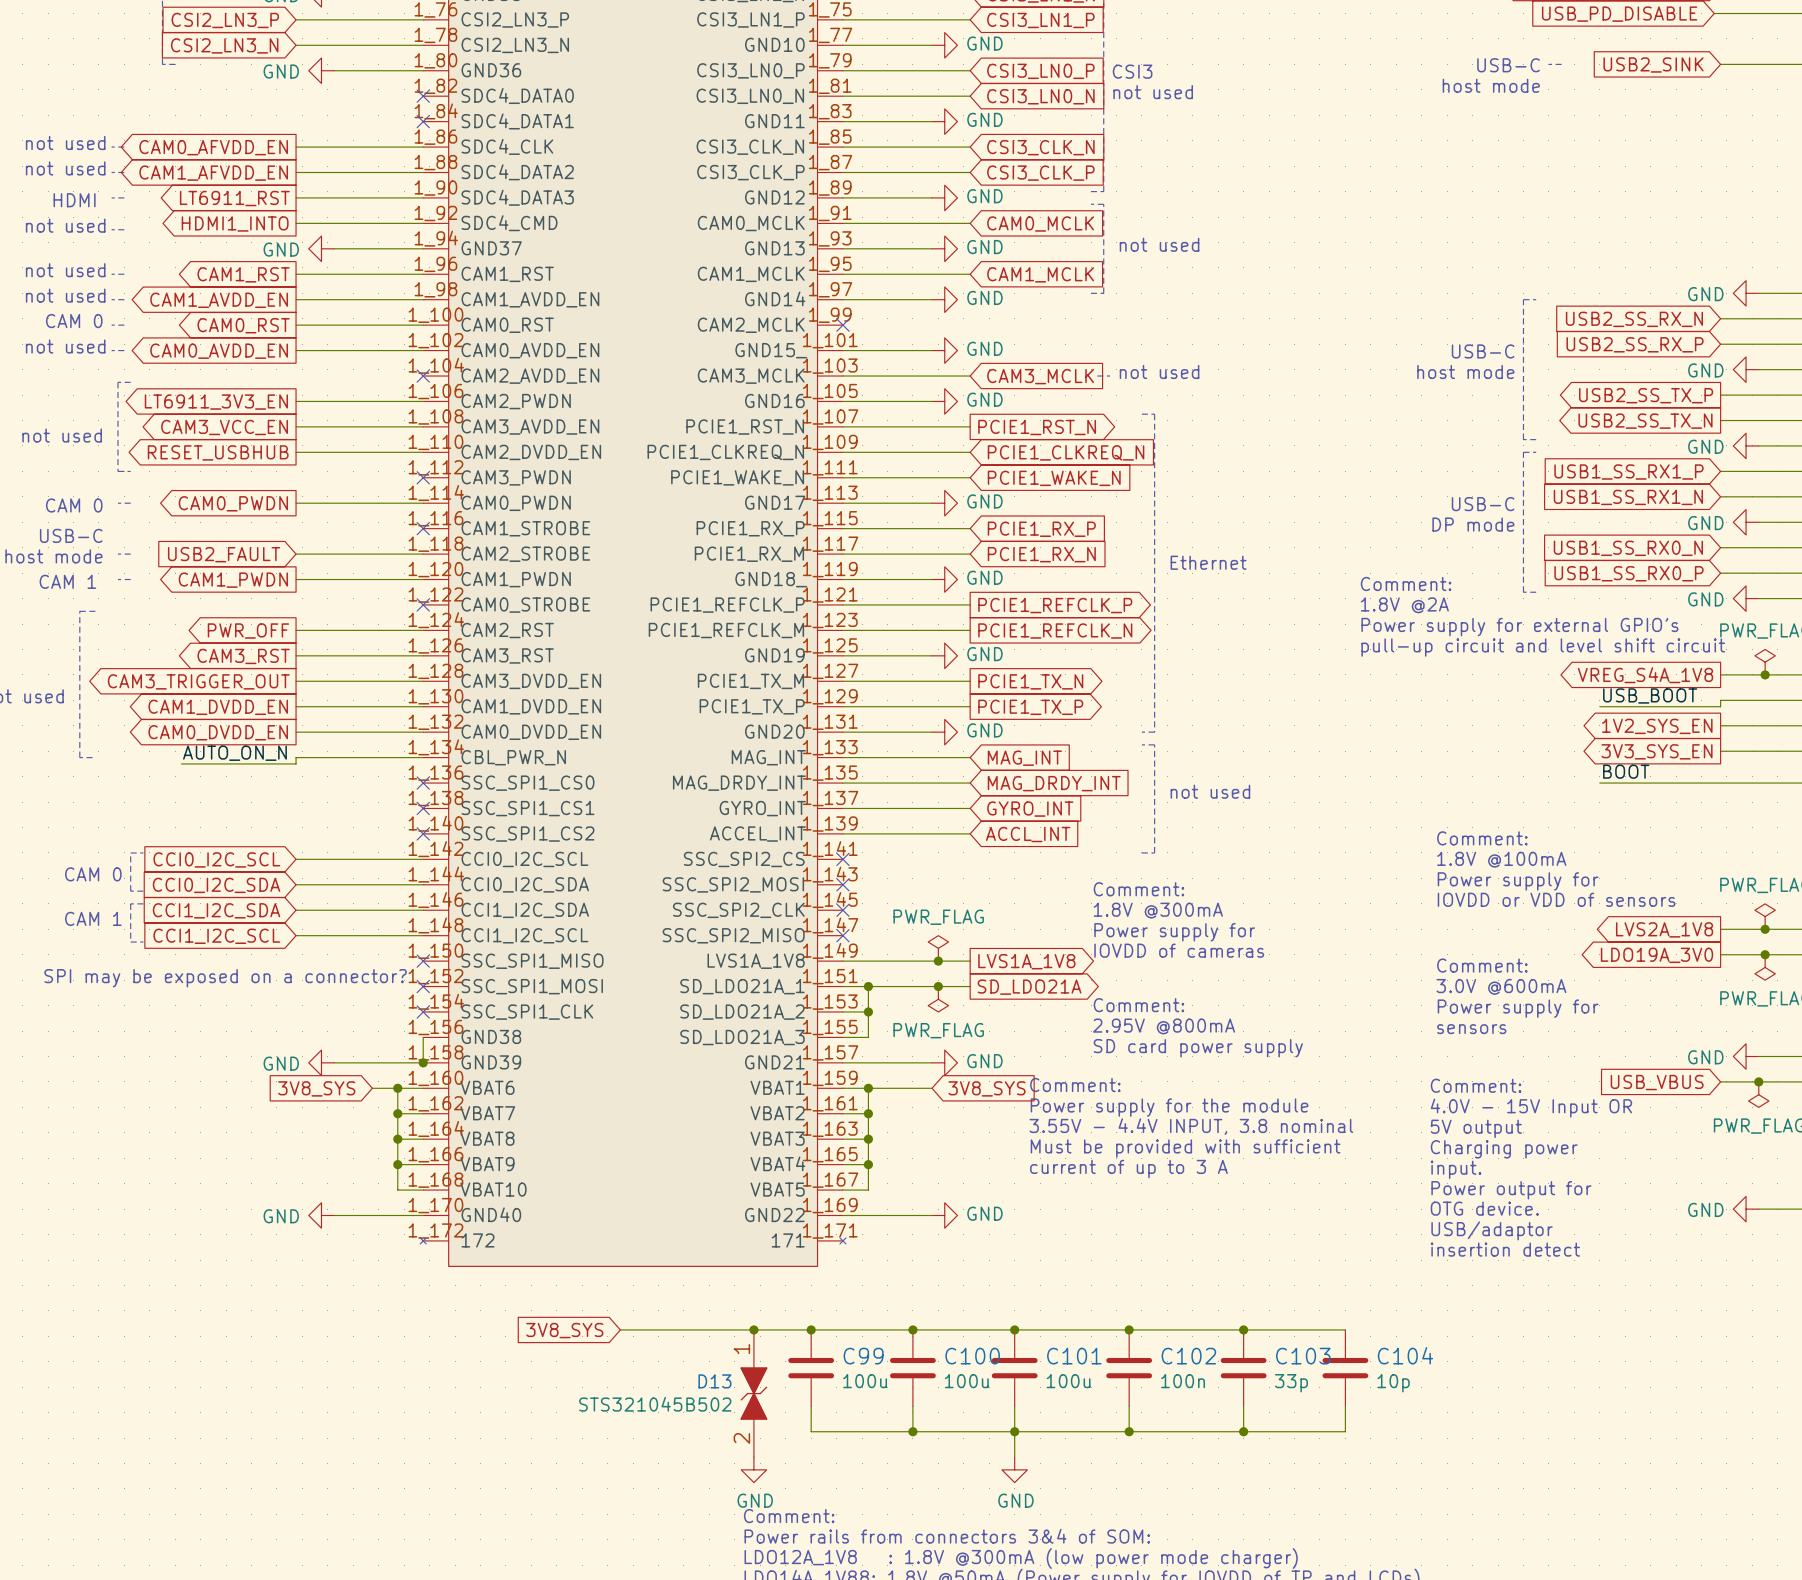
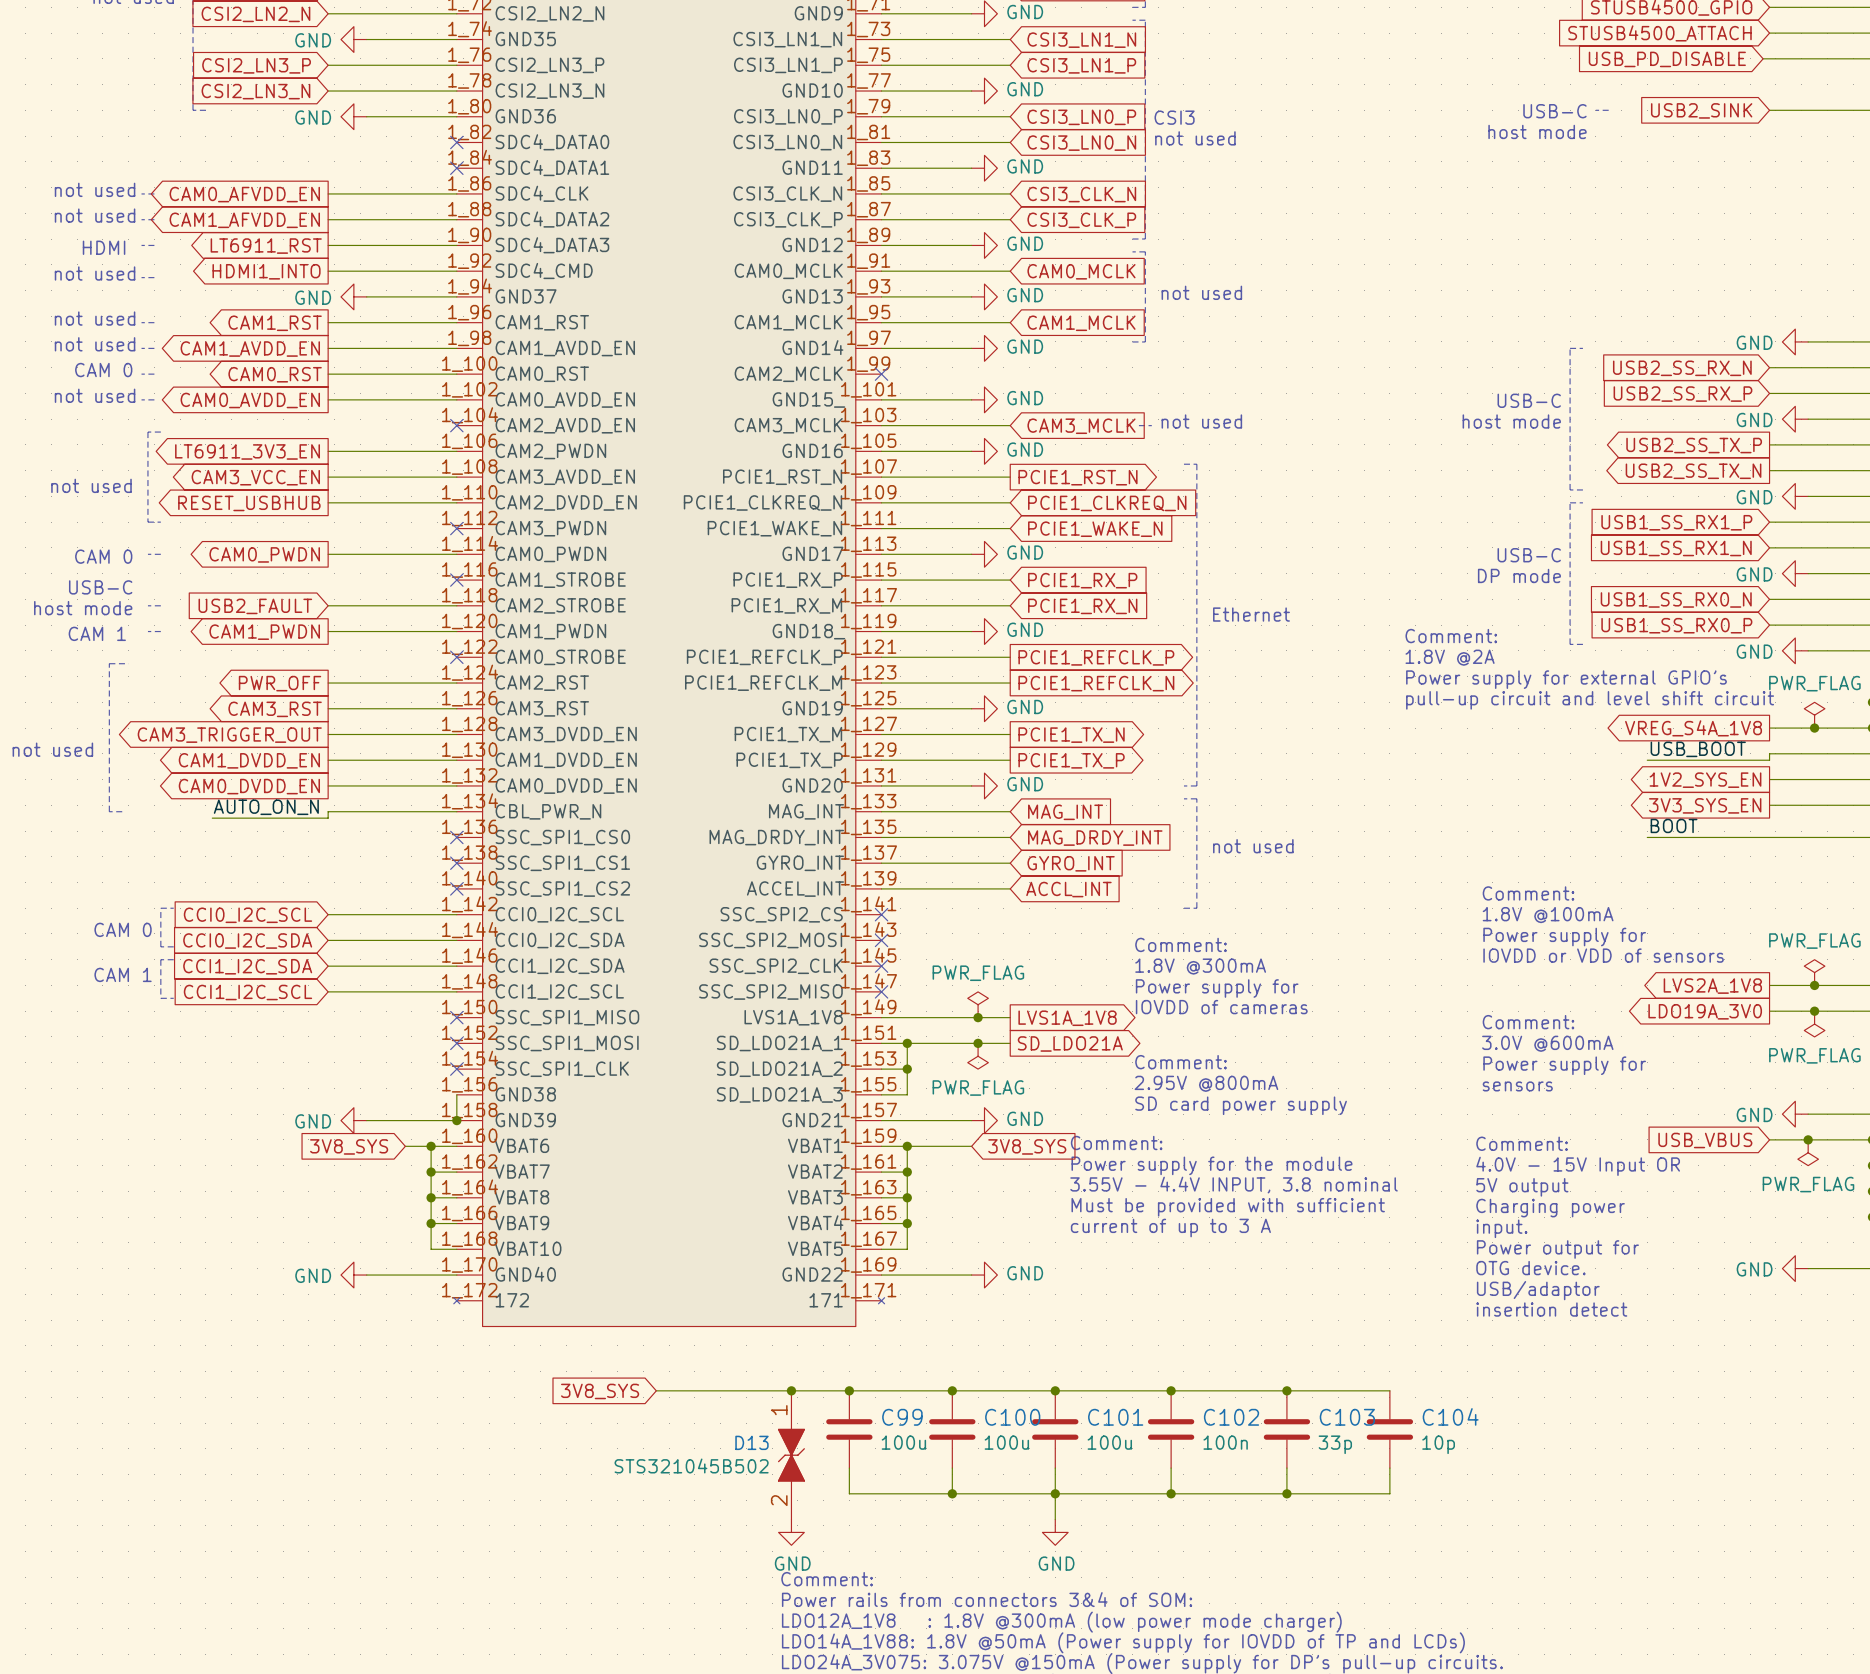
text: SPI may be exposed on a connector? (225, 978) -> none

